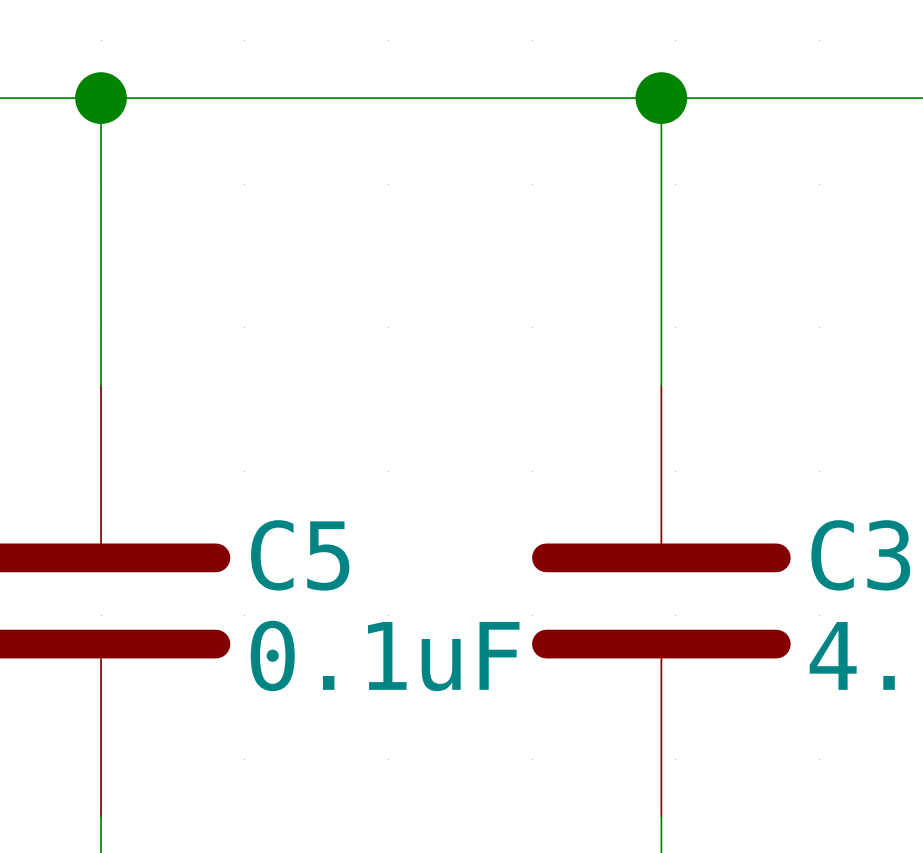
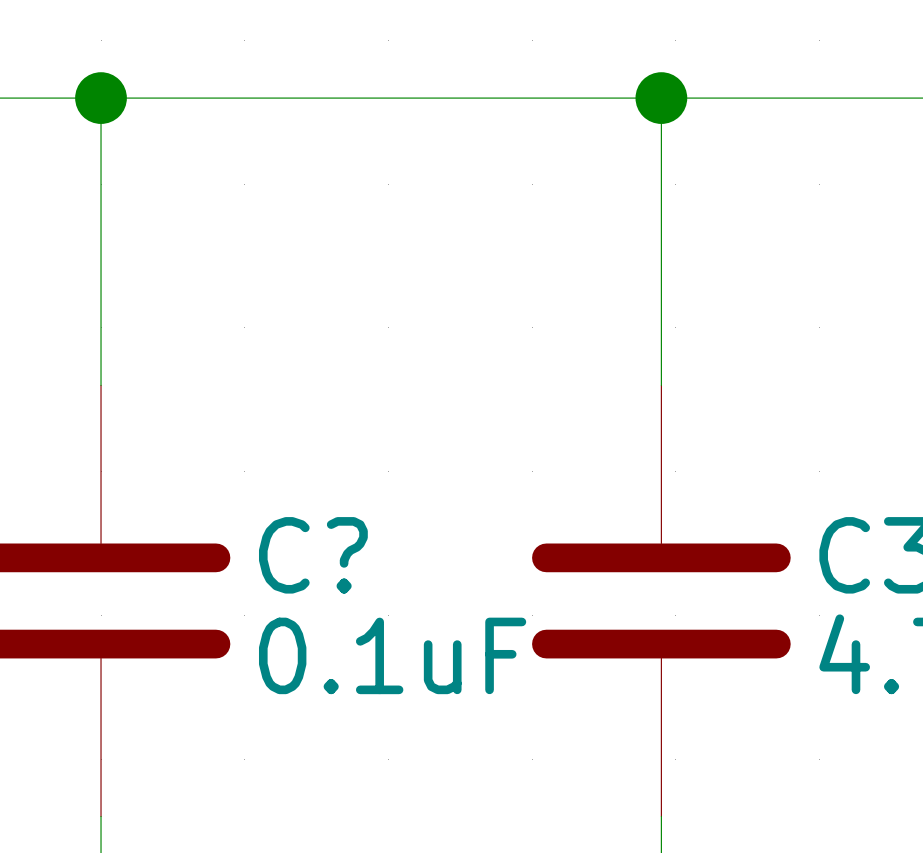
C5 name: C5 (300, 555) -> C? (313, 555)

